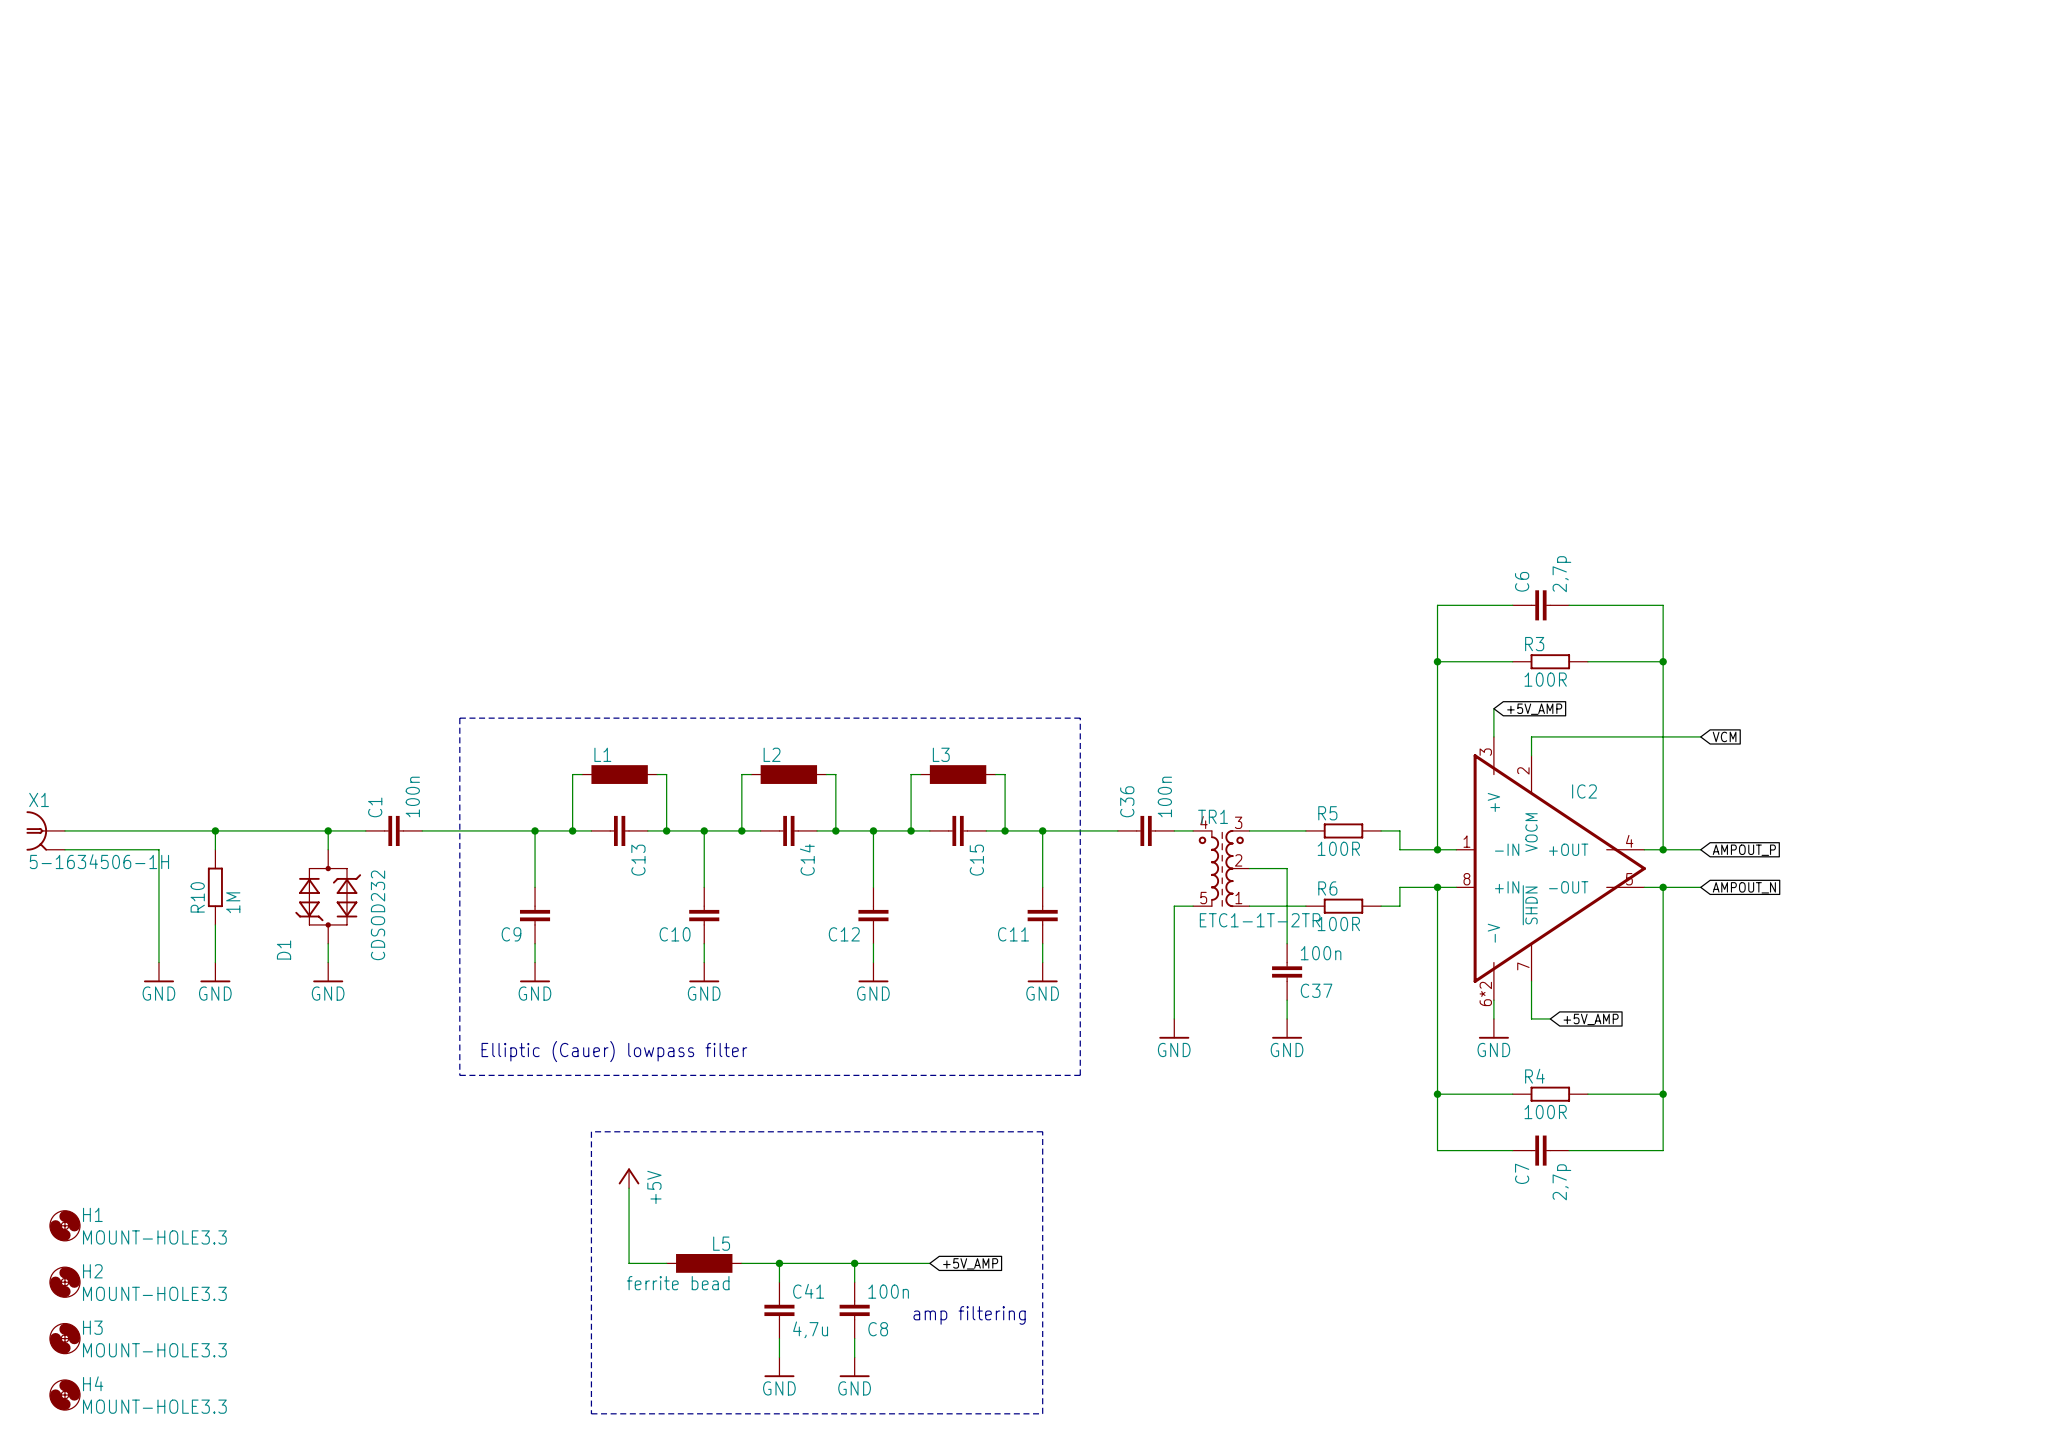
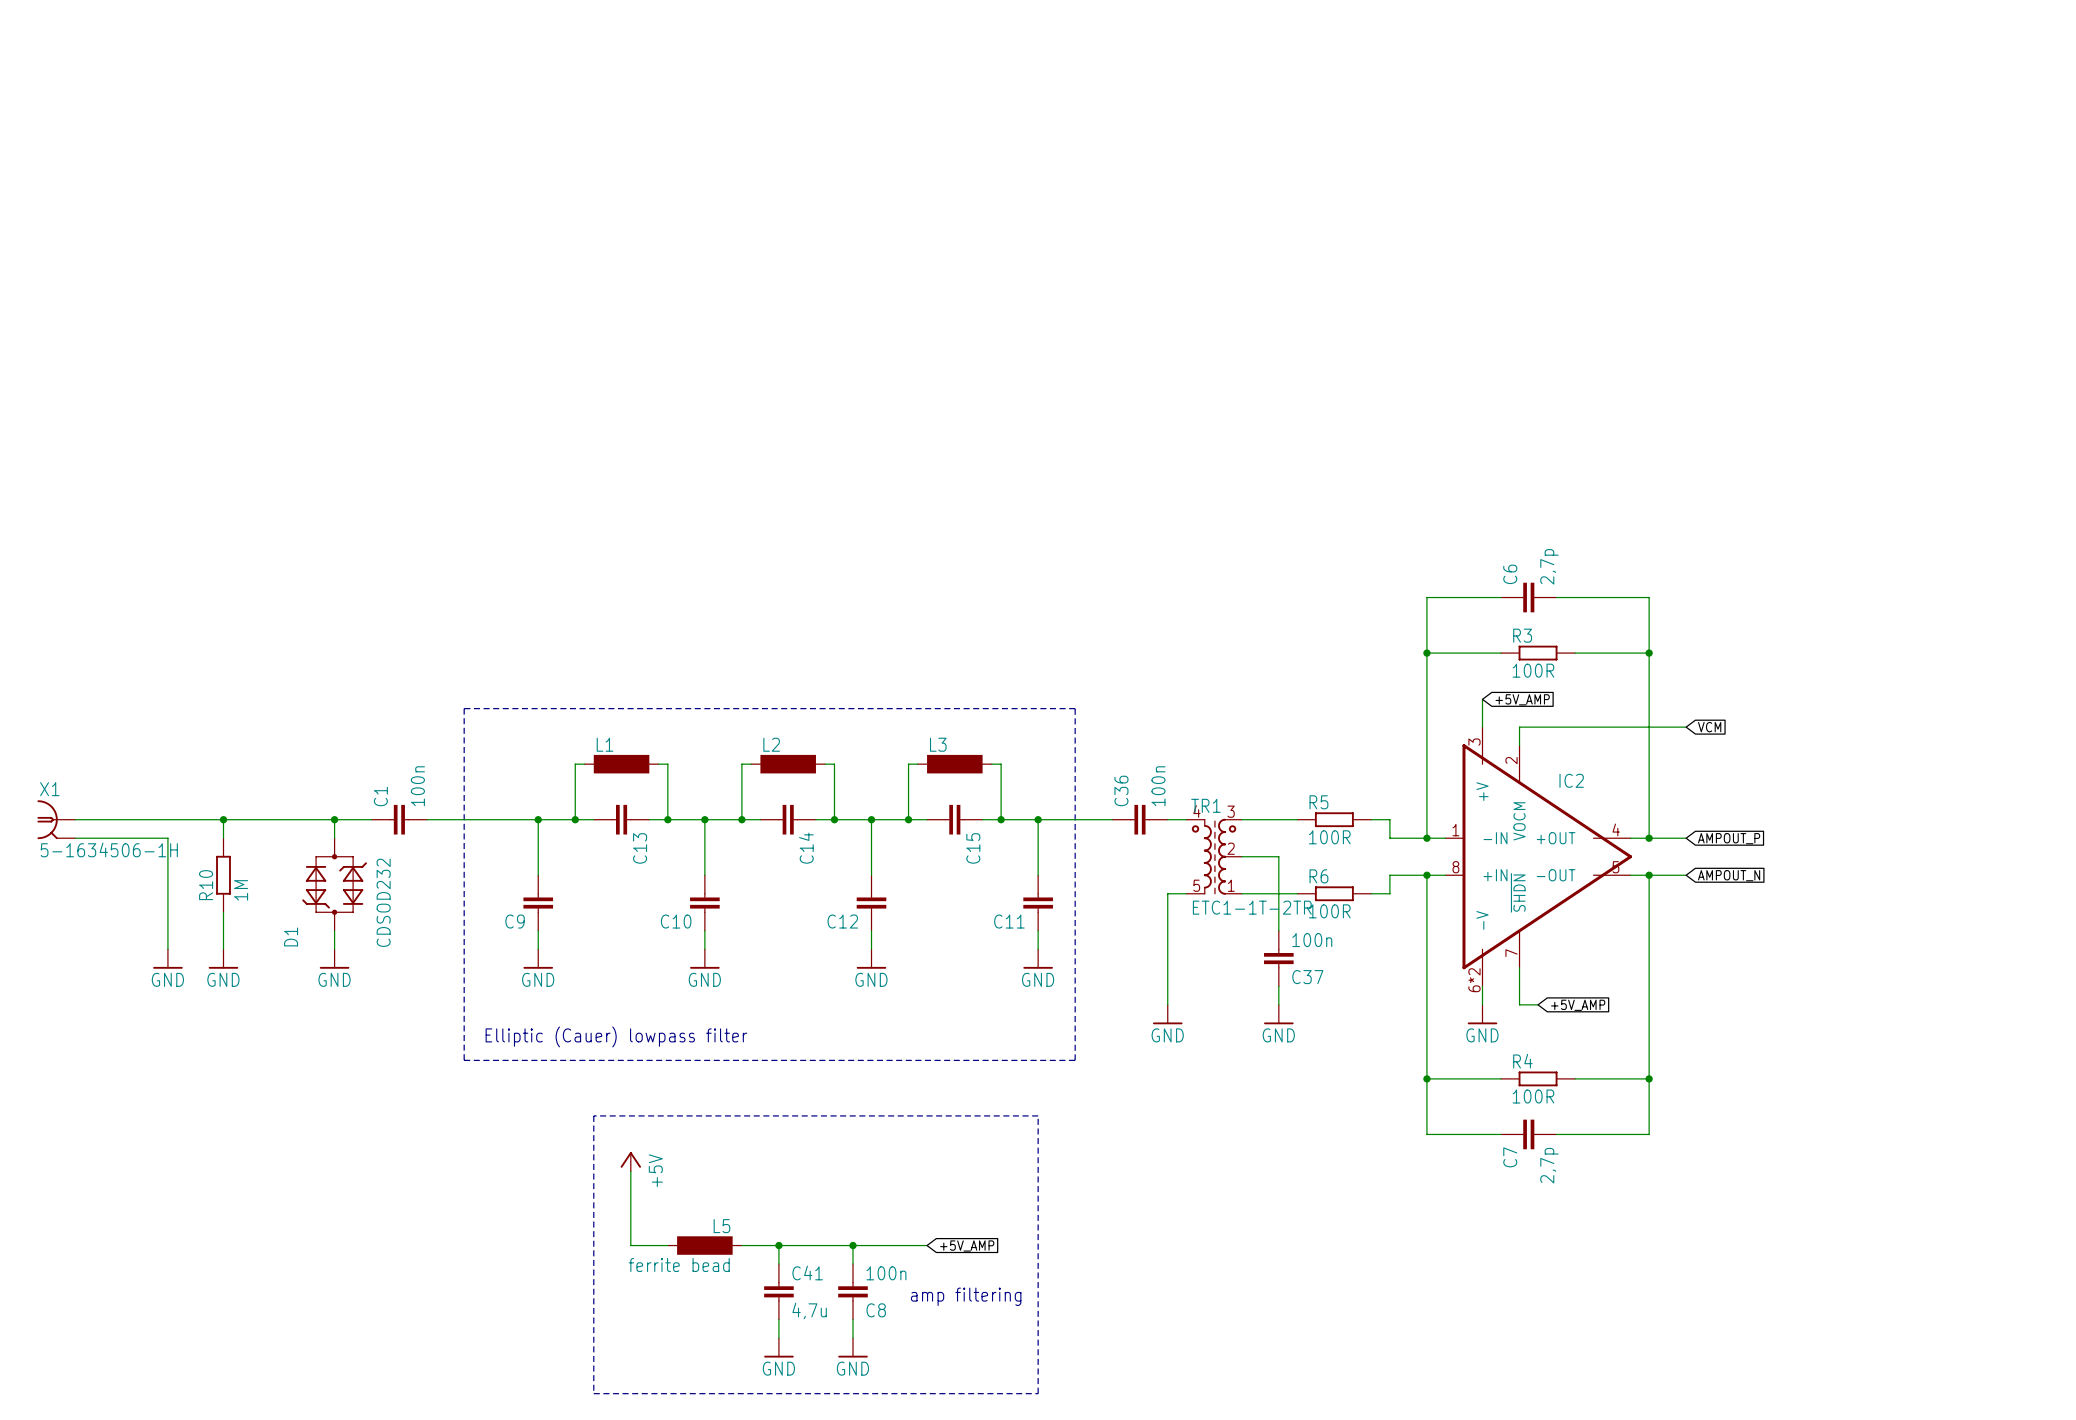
H1: MOUNT-HOLE3.3 (64, 1225) -> none
H2: MOUNT-HOLE3.3 (64, 1282) -> none
H3: MOUNT-HOLE3.3 (64, 1338) -> none
H4: MOUNT-HOLE3.3 (64, 1395) -> none

